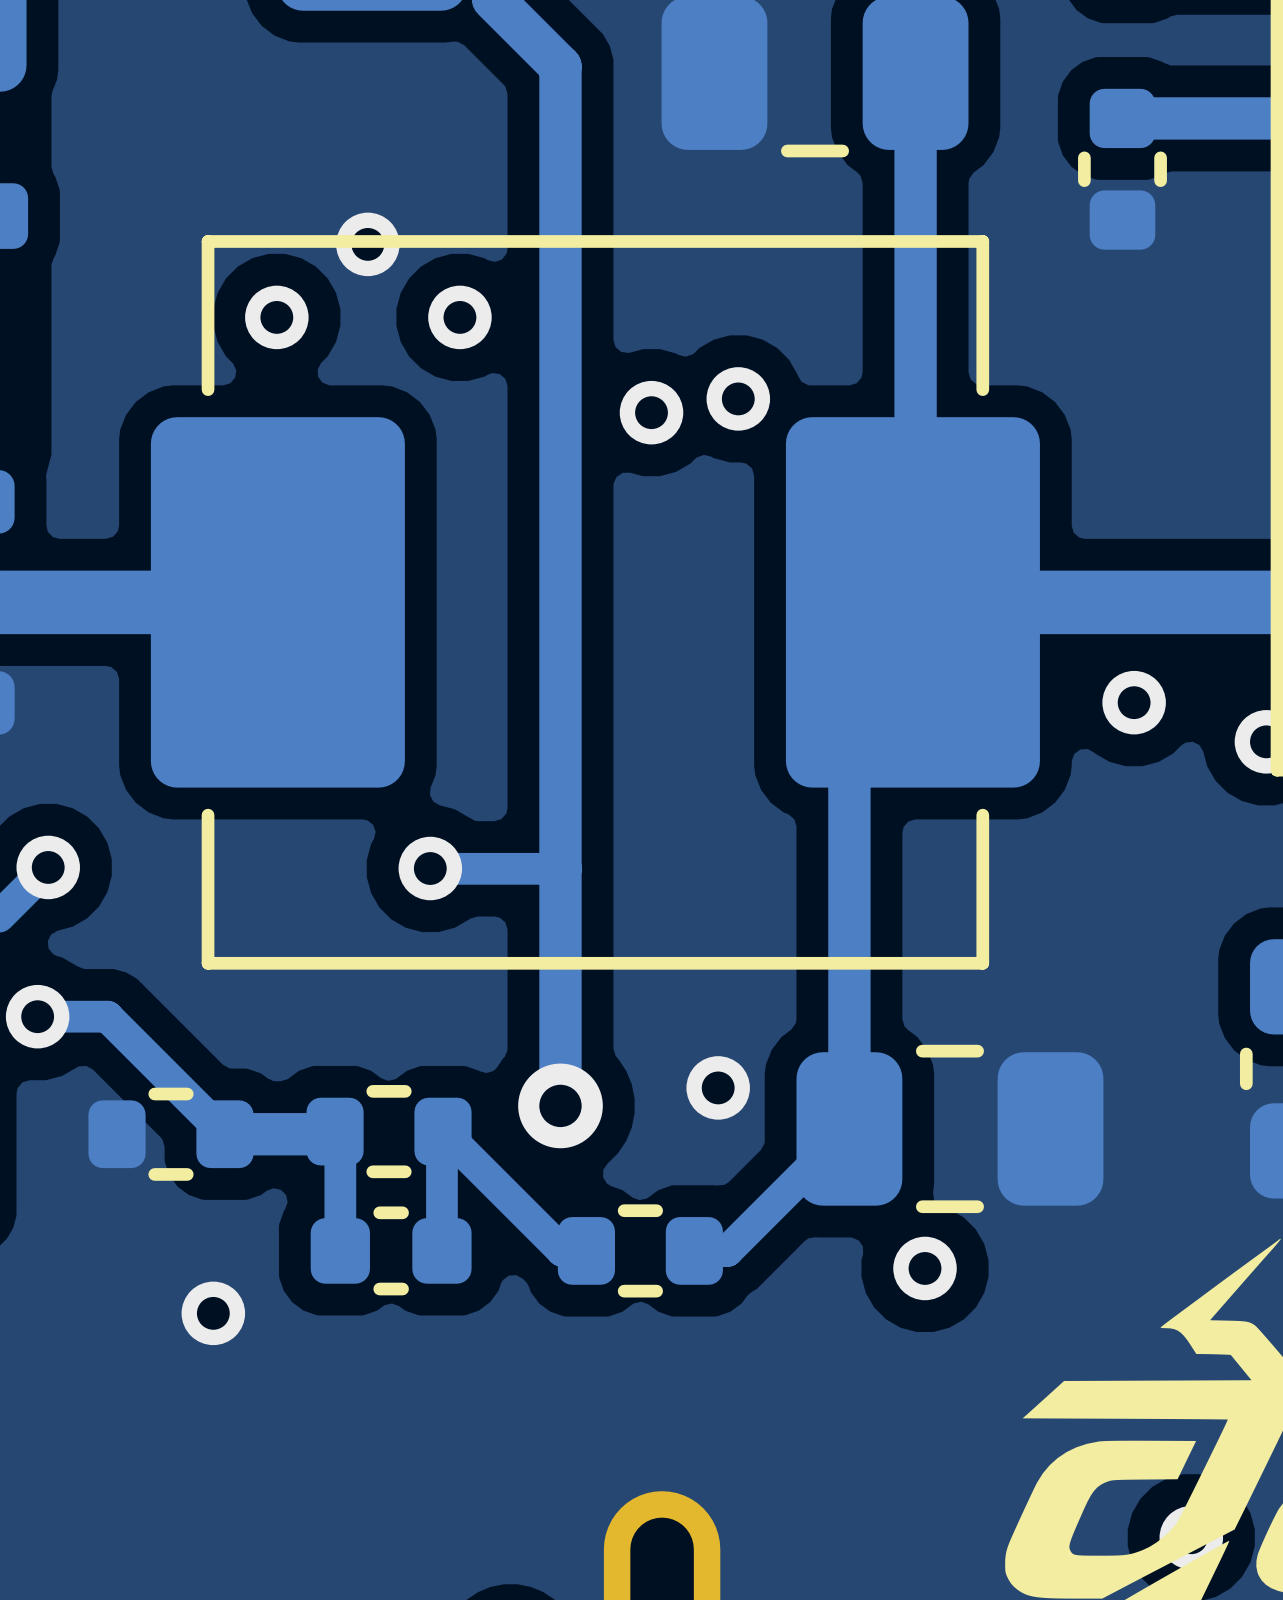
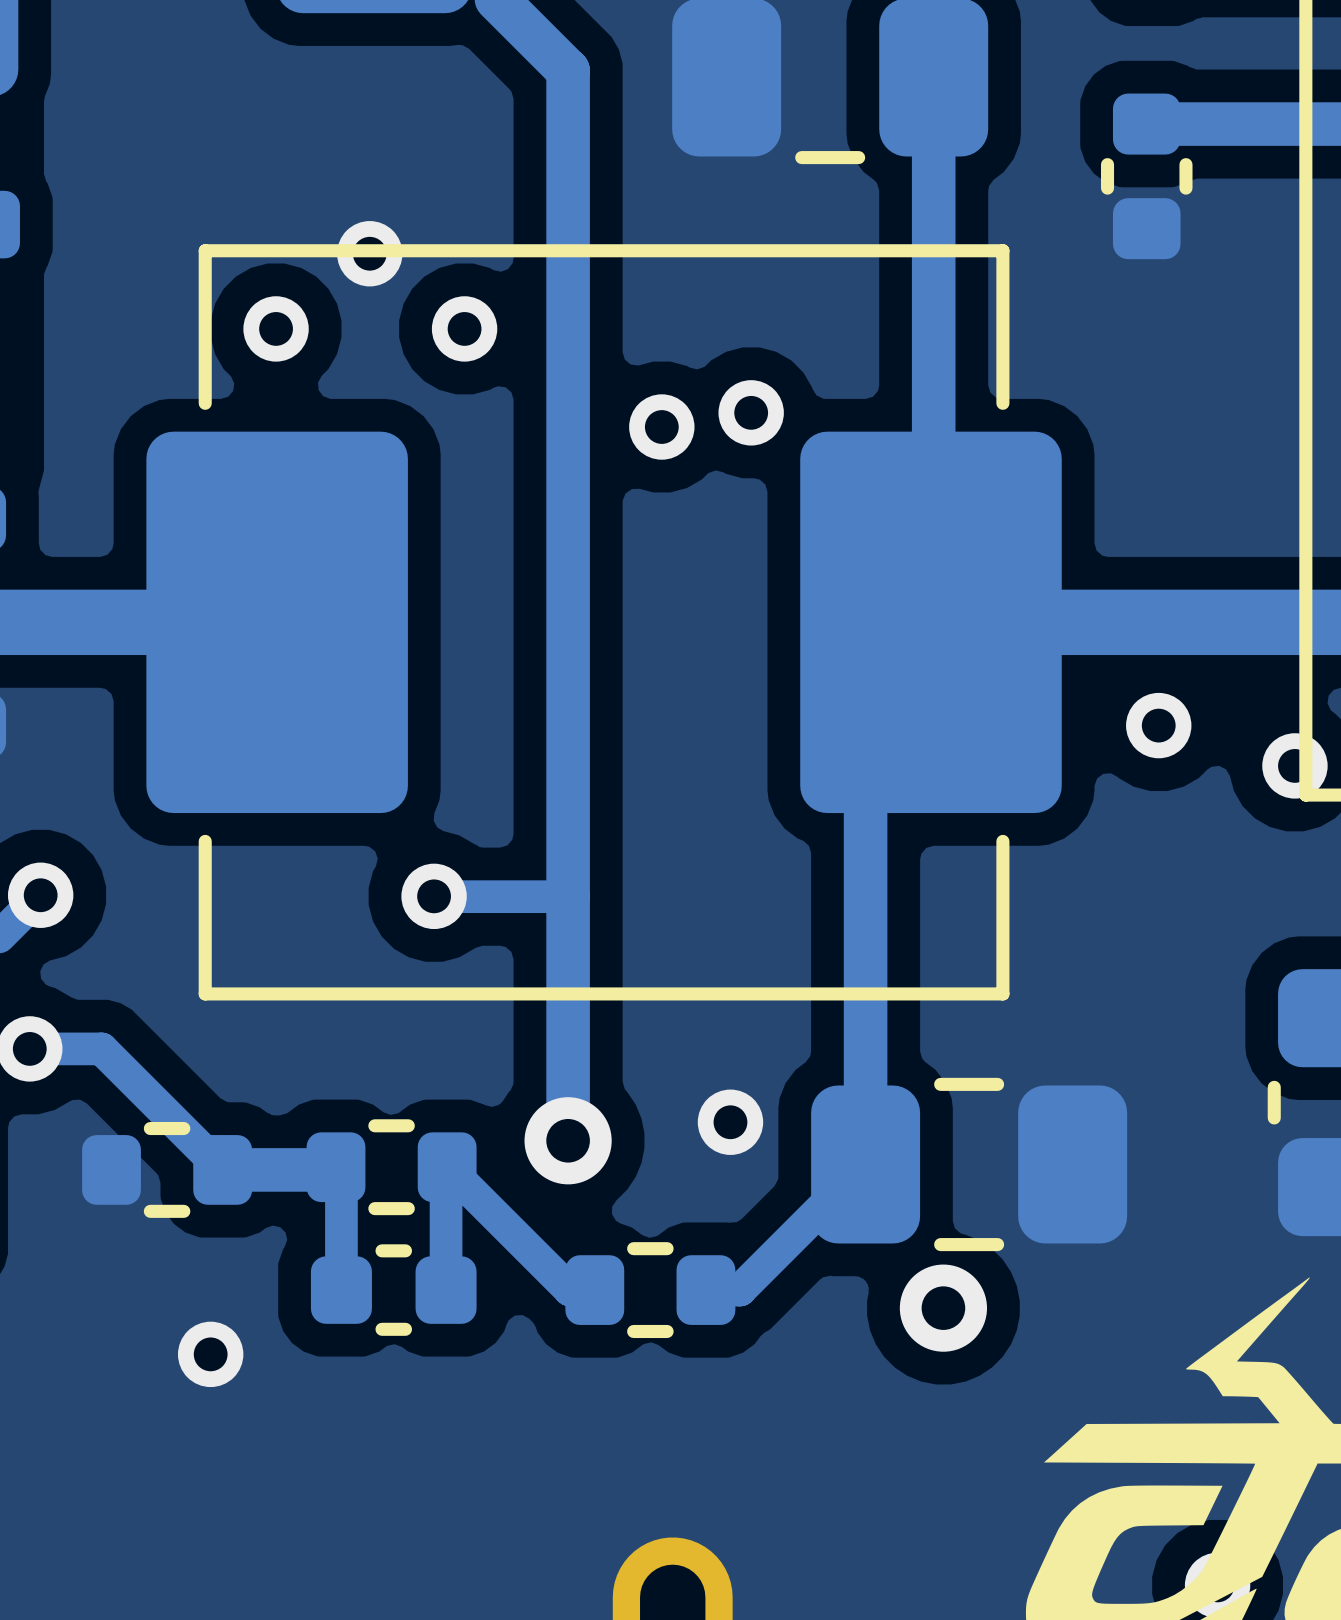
via size: [893, 1236, 957, 1301] -> [899, 1264, 988, 1352]

